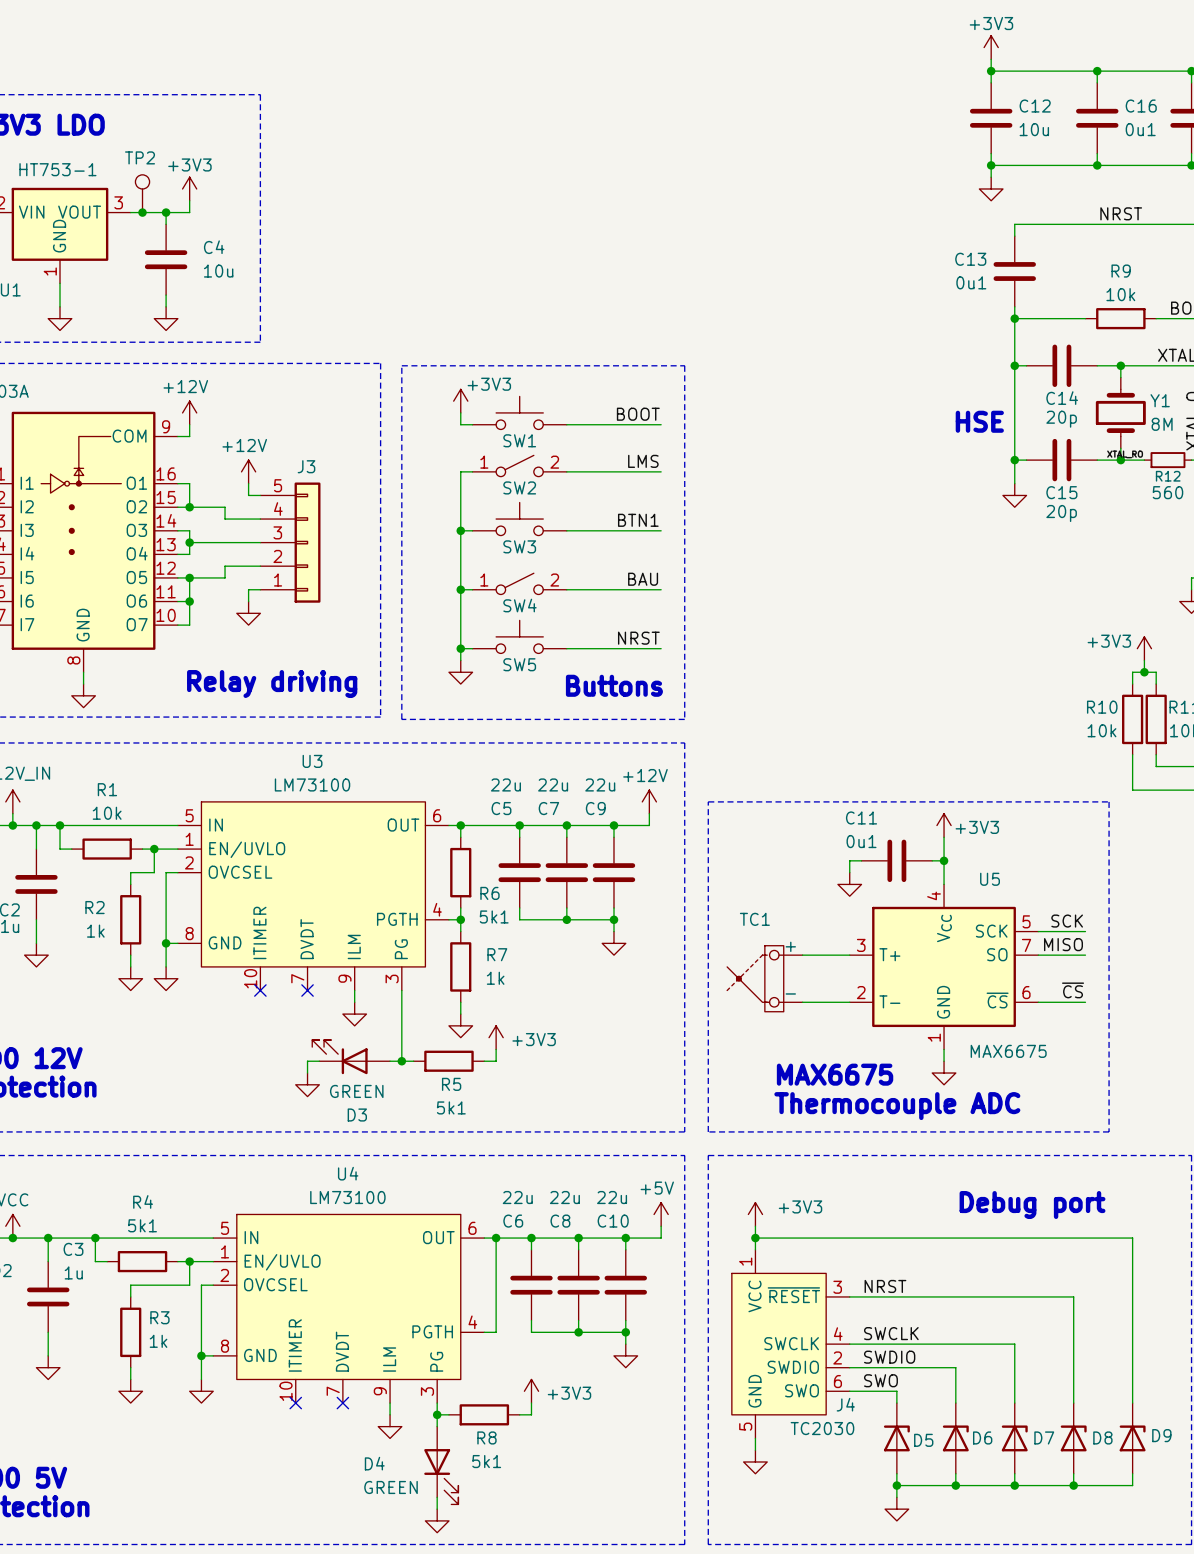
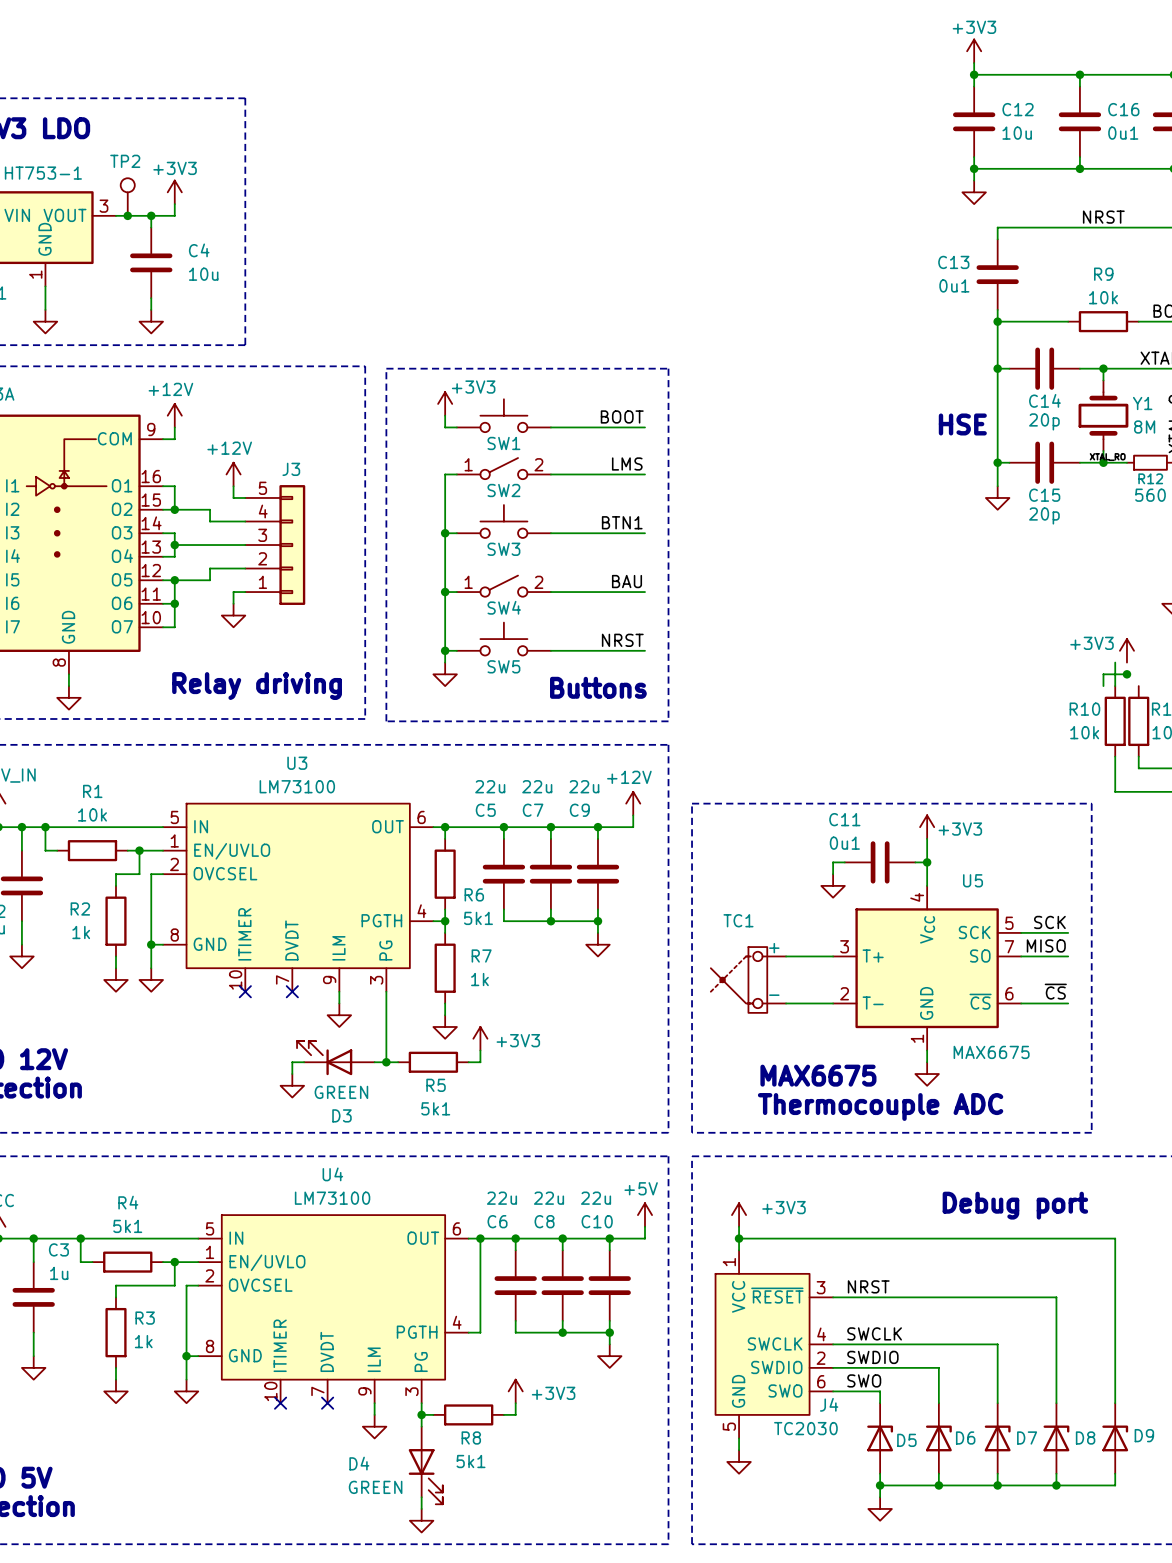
wire: none -> (1115, 662) (1115, 674) (1103, 674) (1103, 686)
wire: (1144, 660) (1144, 672) (1156, 672) (1156, 684) -> none

